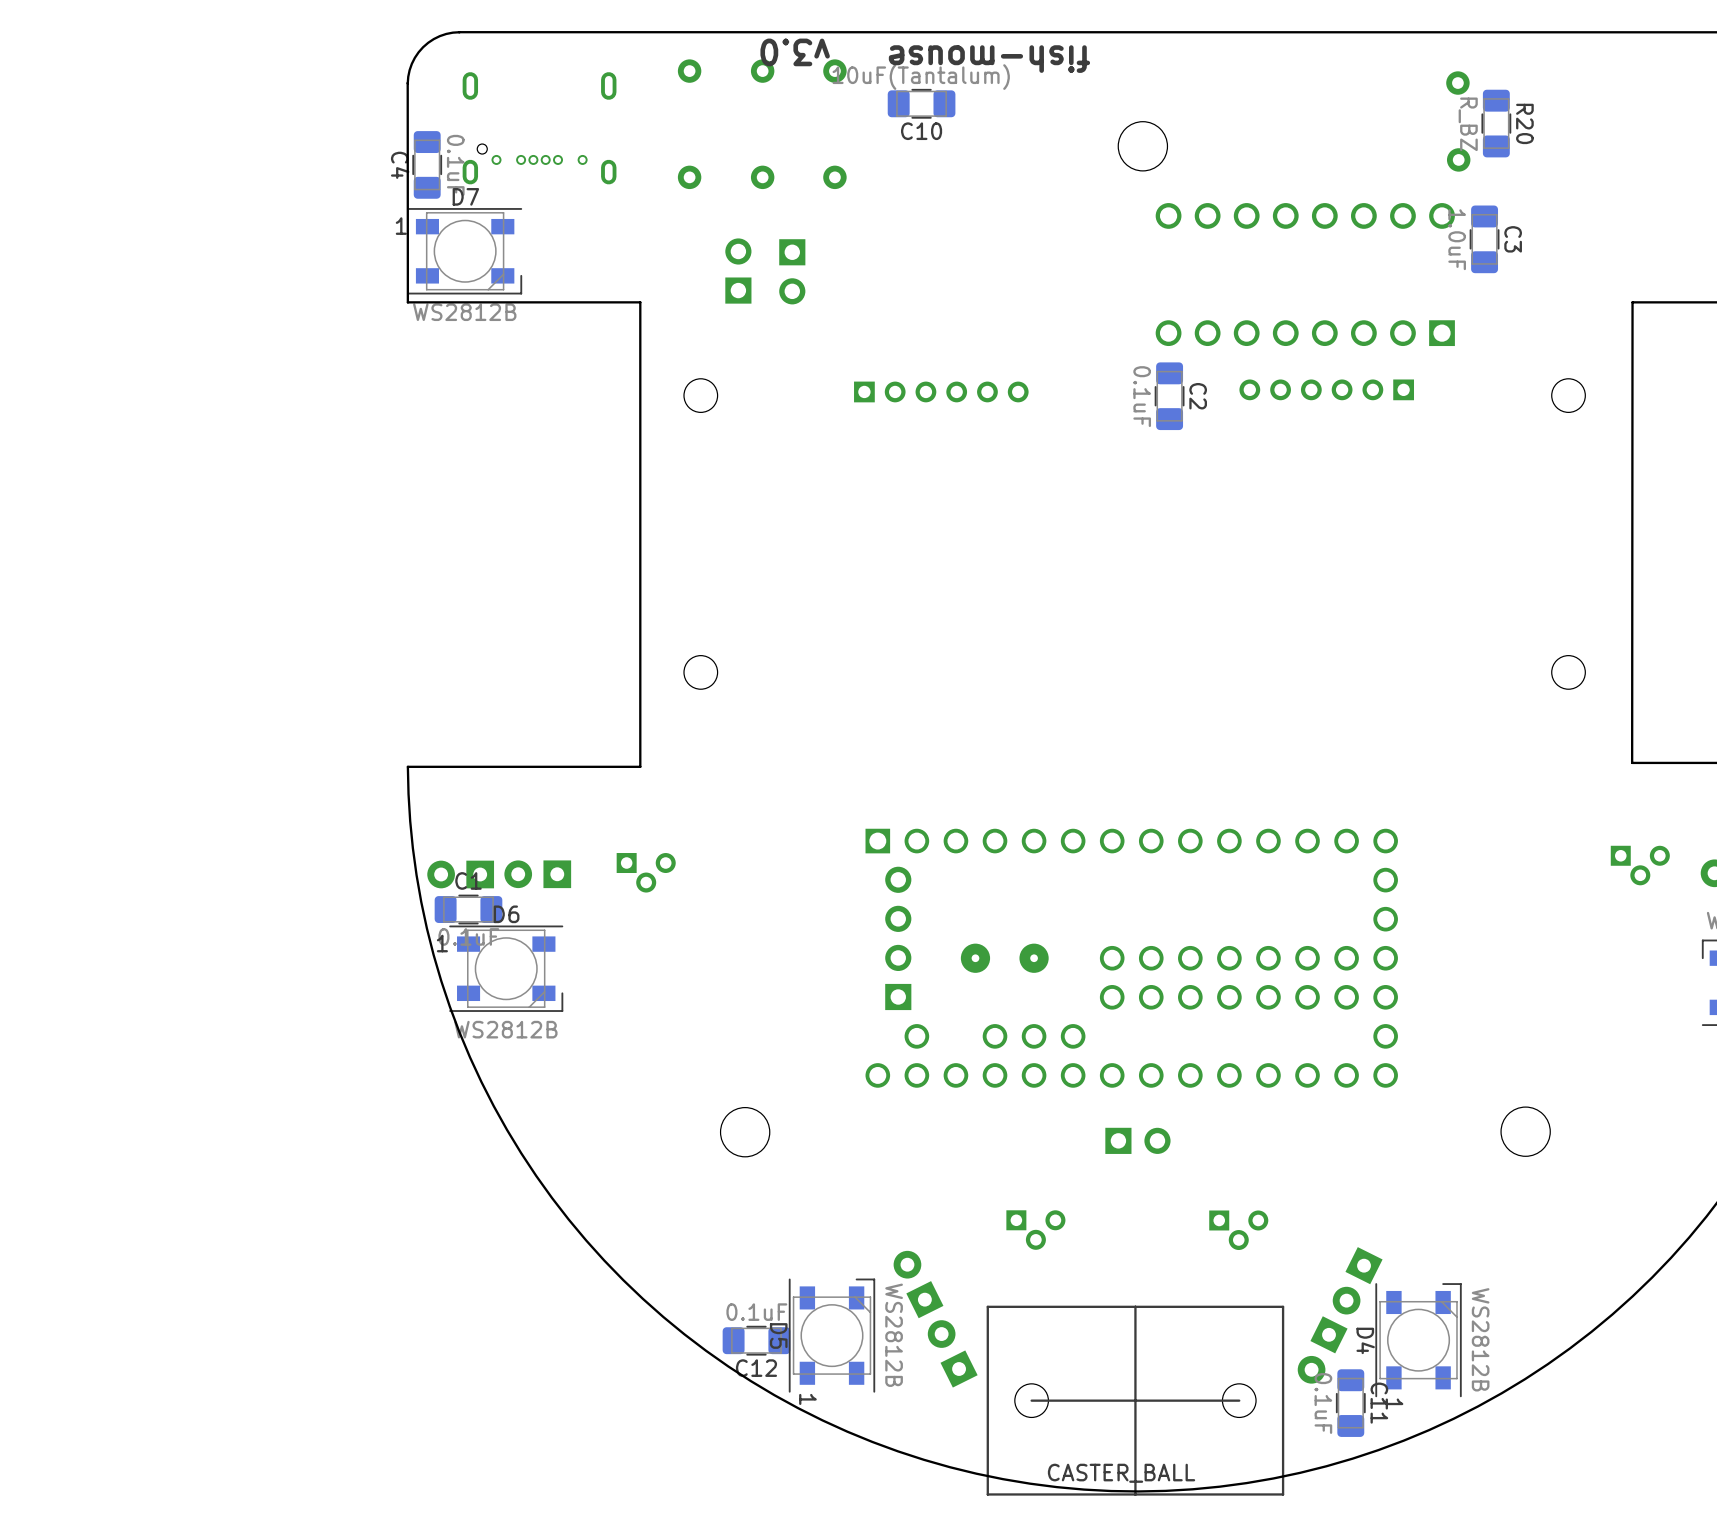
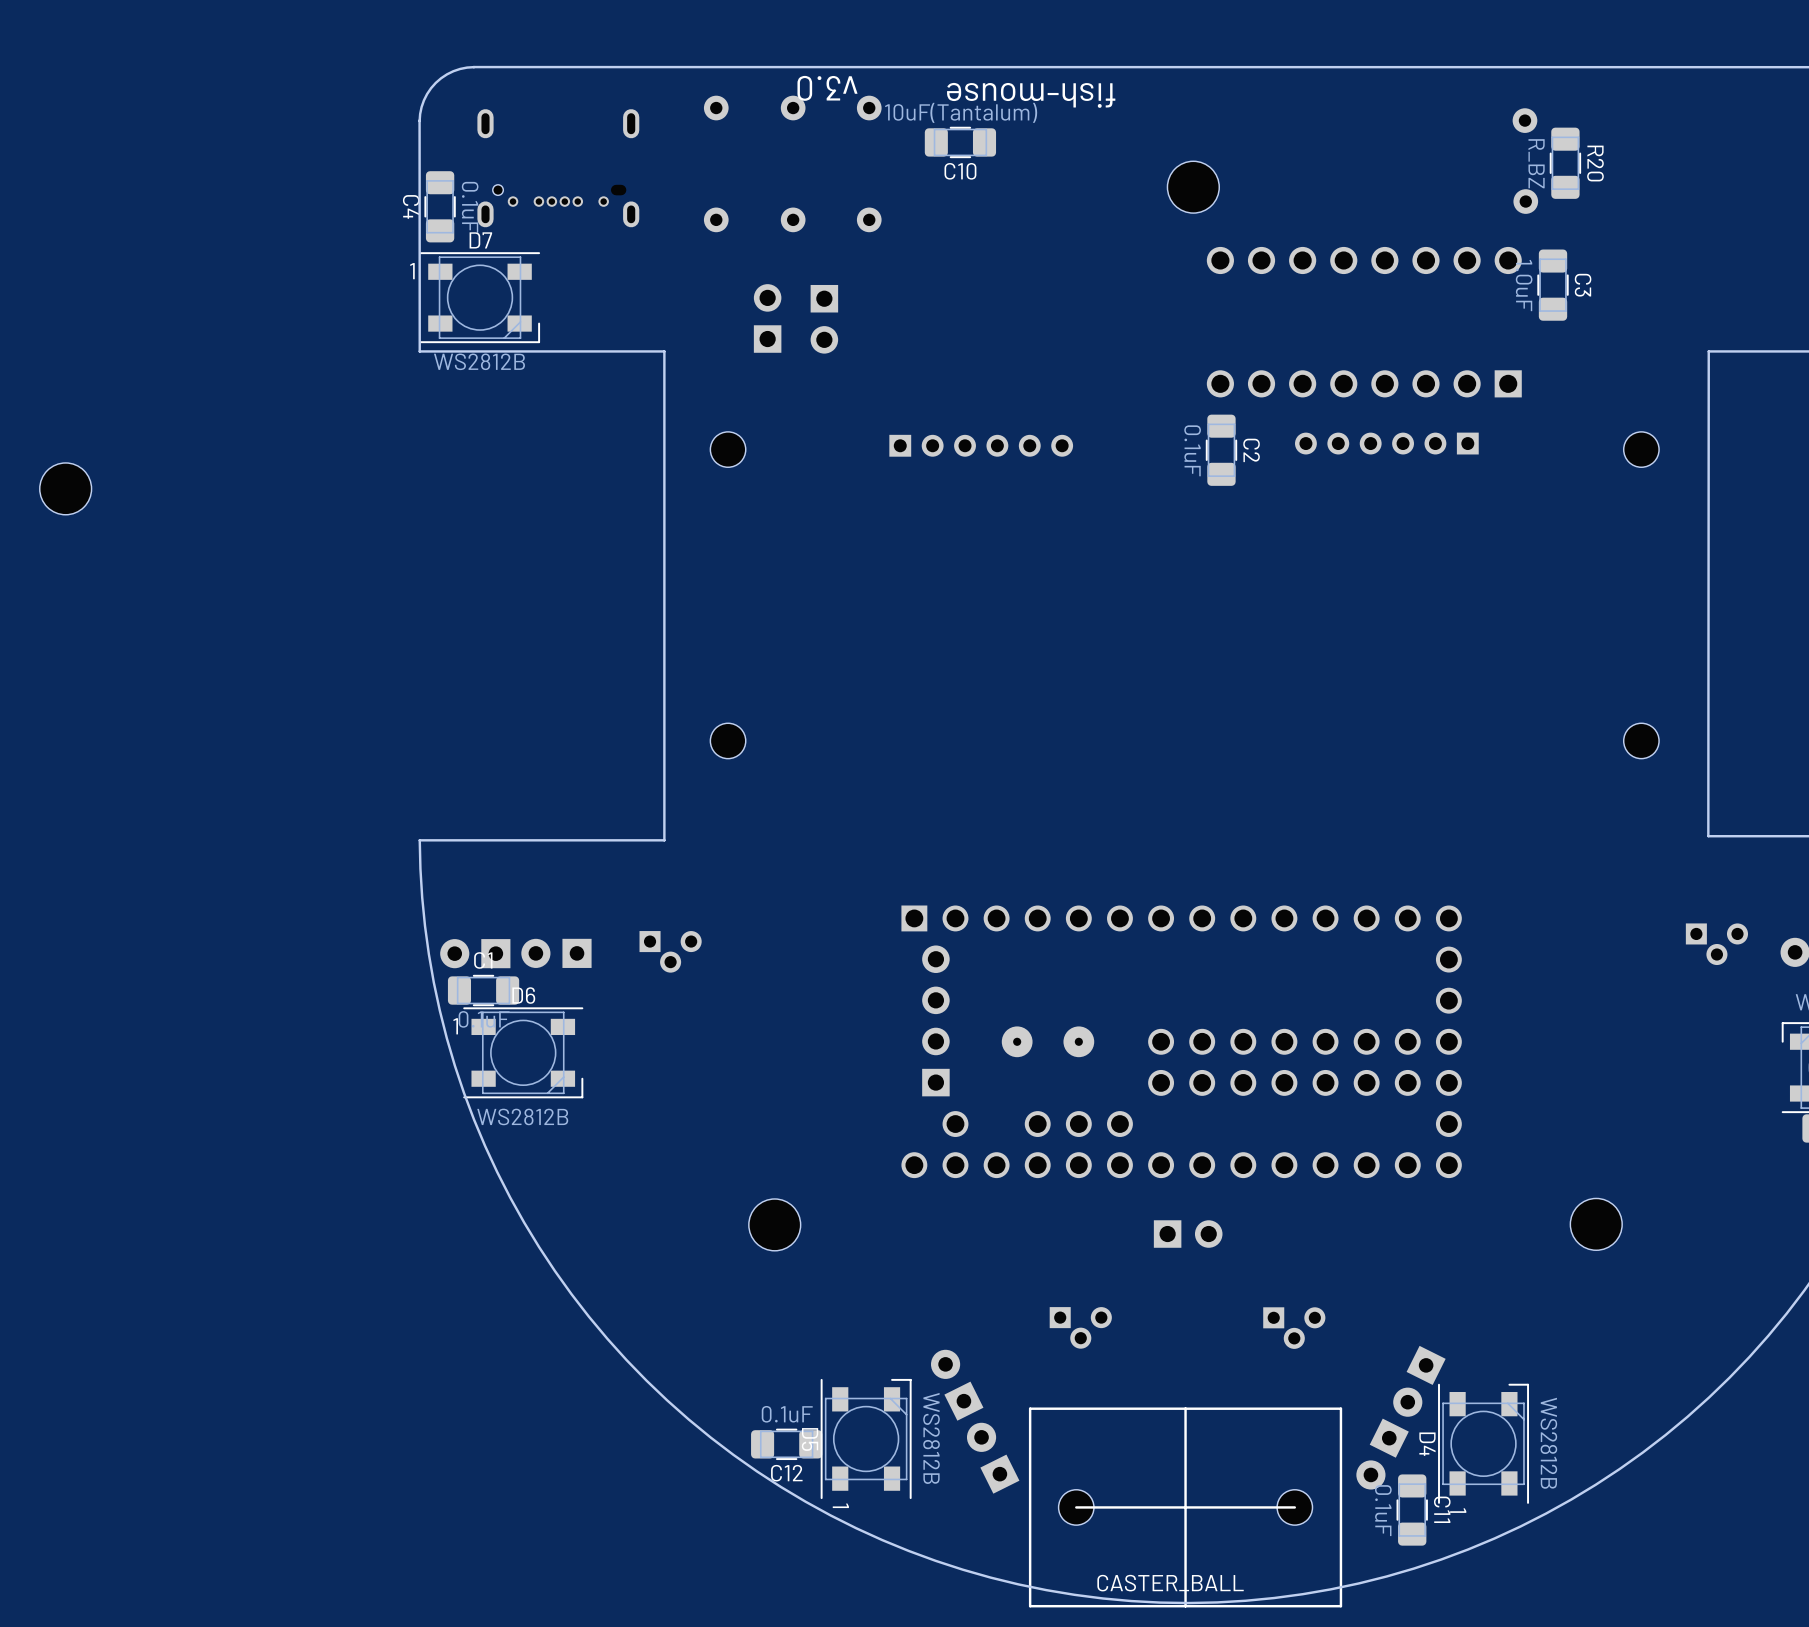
part: none -> (65, 488)

